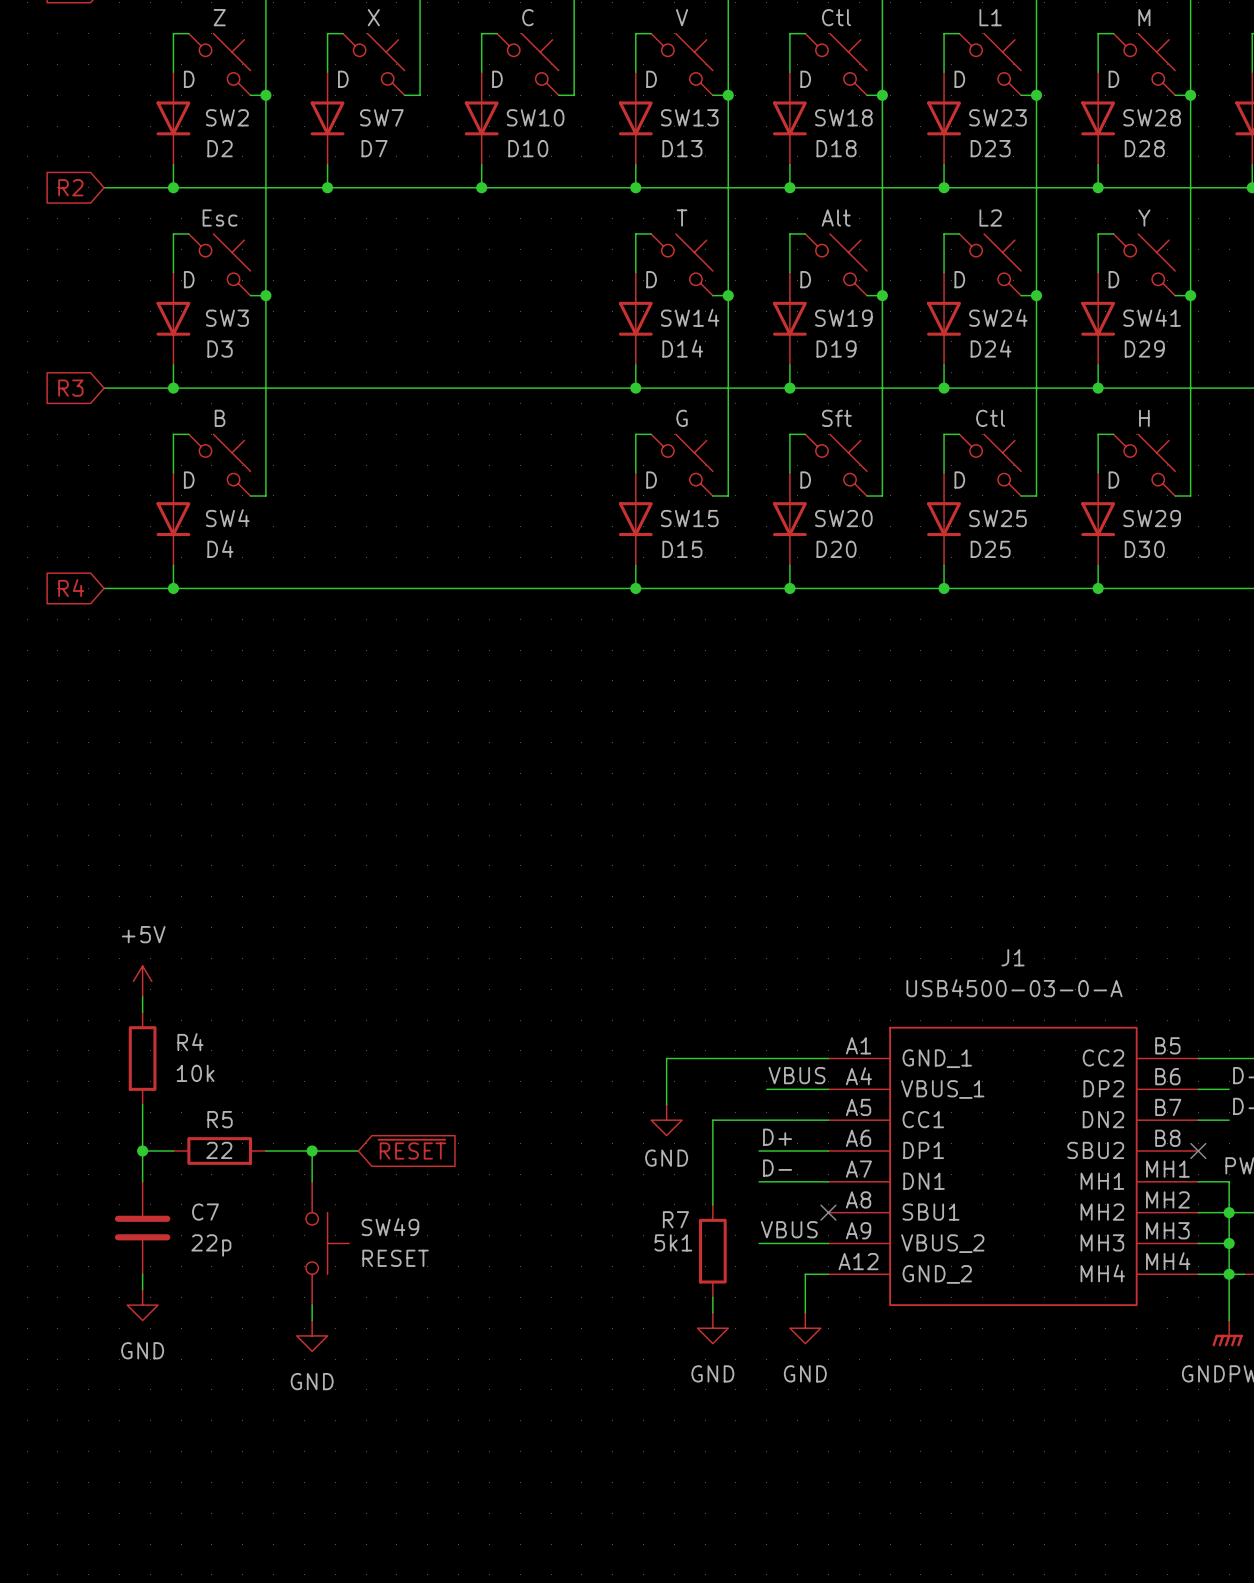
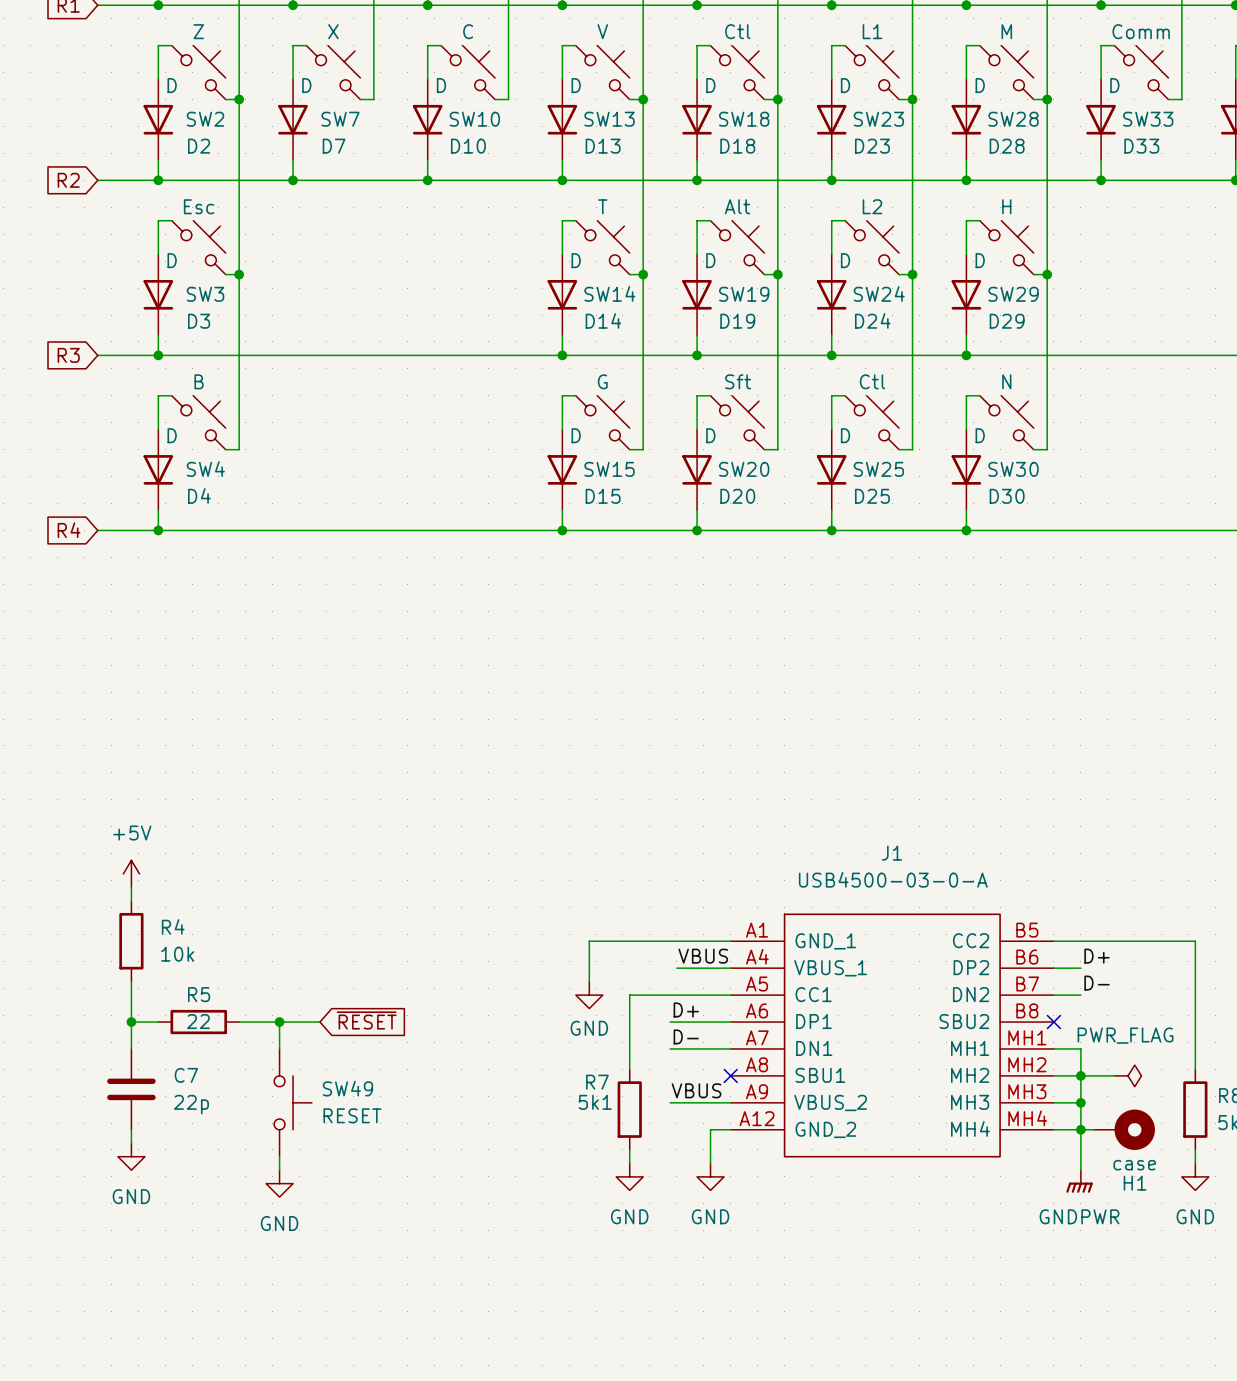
SW41 value: Y (1144, 218) -> H (1006, 206)
SW41 name: SW41 (1152, 317) -> SW29 (1013, 294)
SW29 value: H (1144, 418) -> N (1006, 381)
SW29 name: SW29 (1152, 518) -> SW30 (1013, 469)

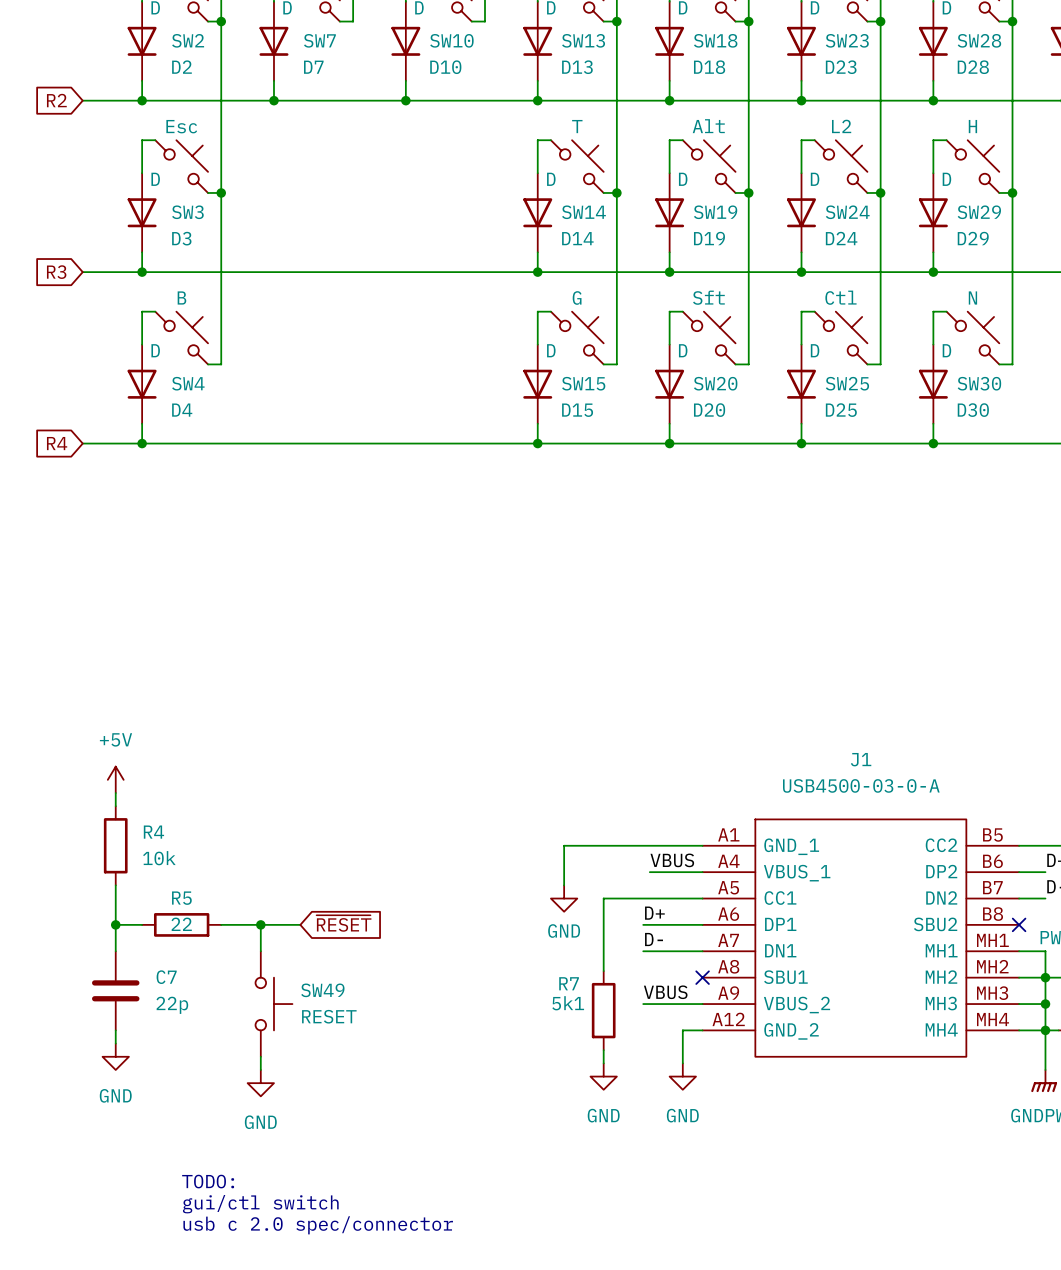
text: none -> TODO: (208, 1181)
text: none -> gui/ctl switch (260, 1204)
text: none -> usb c 2.0 spec/connector (318, 1225)

